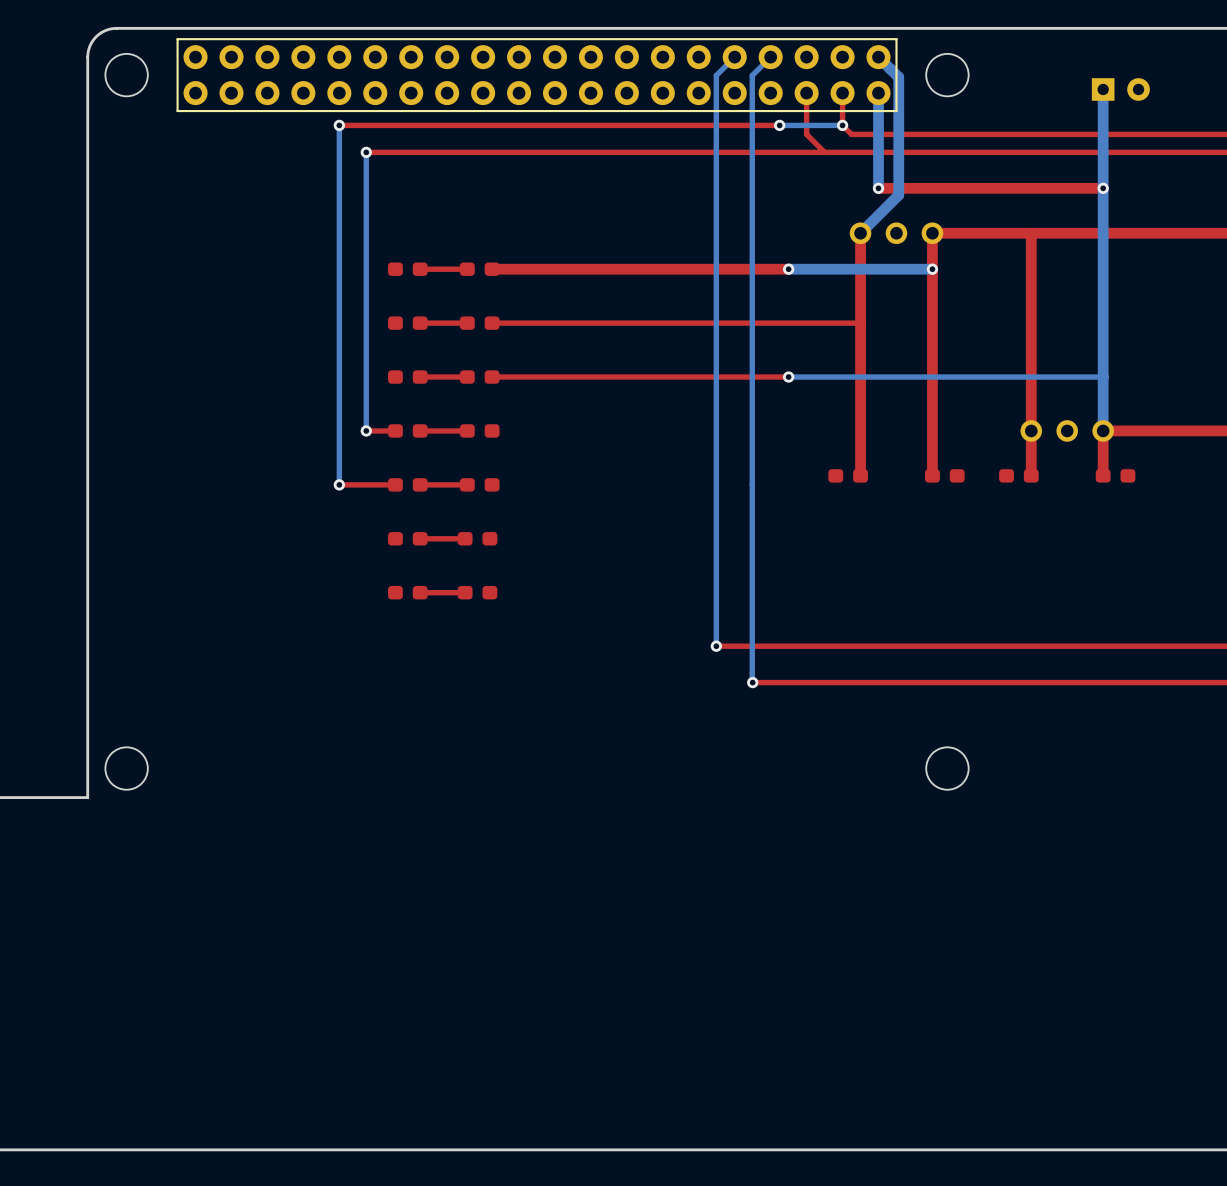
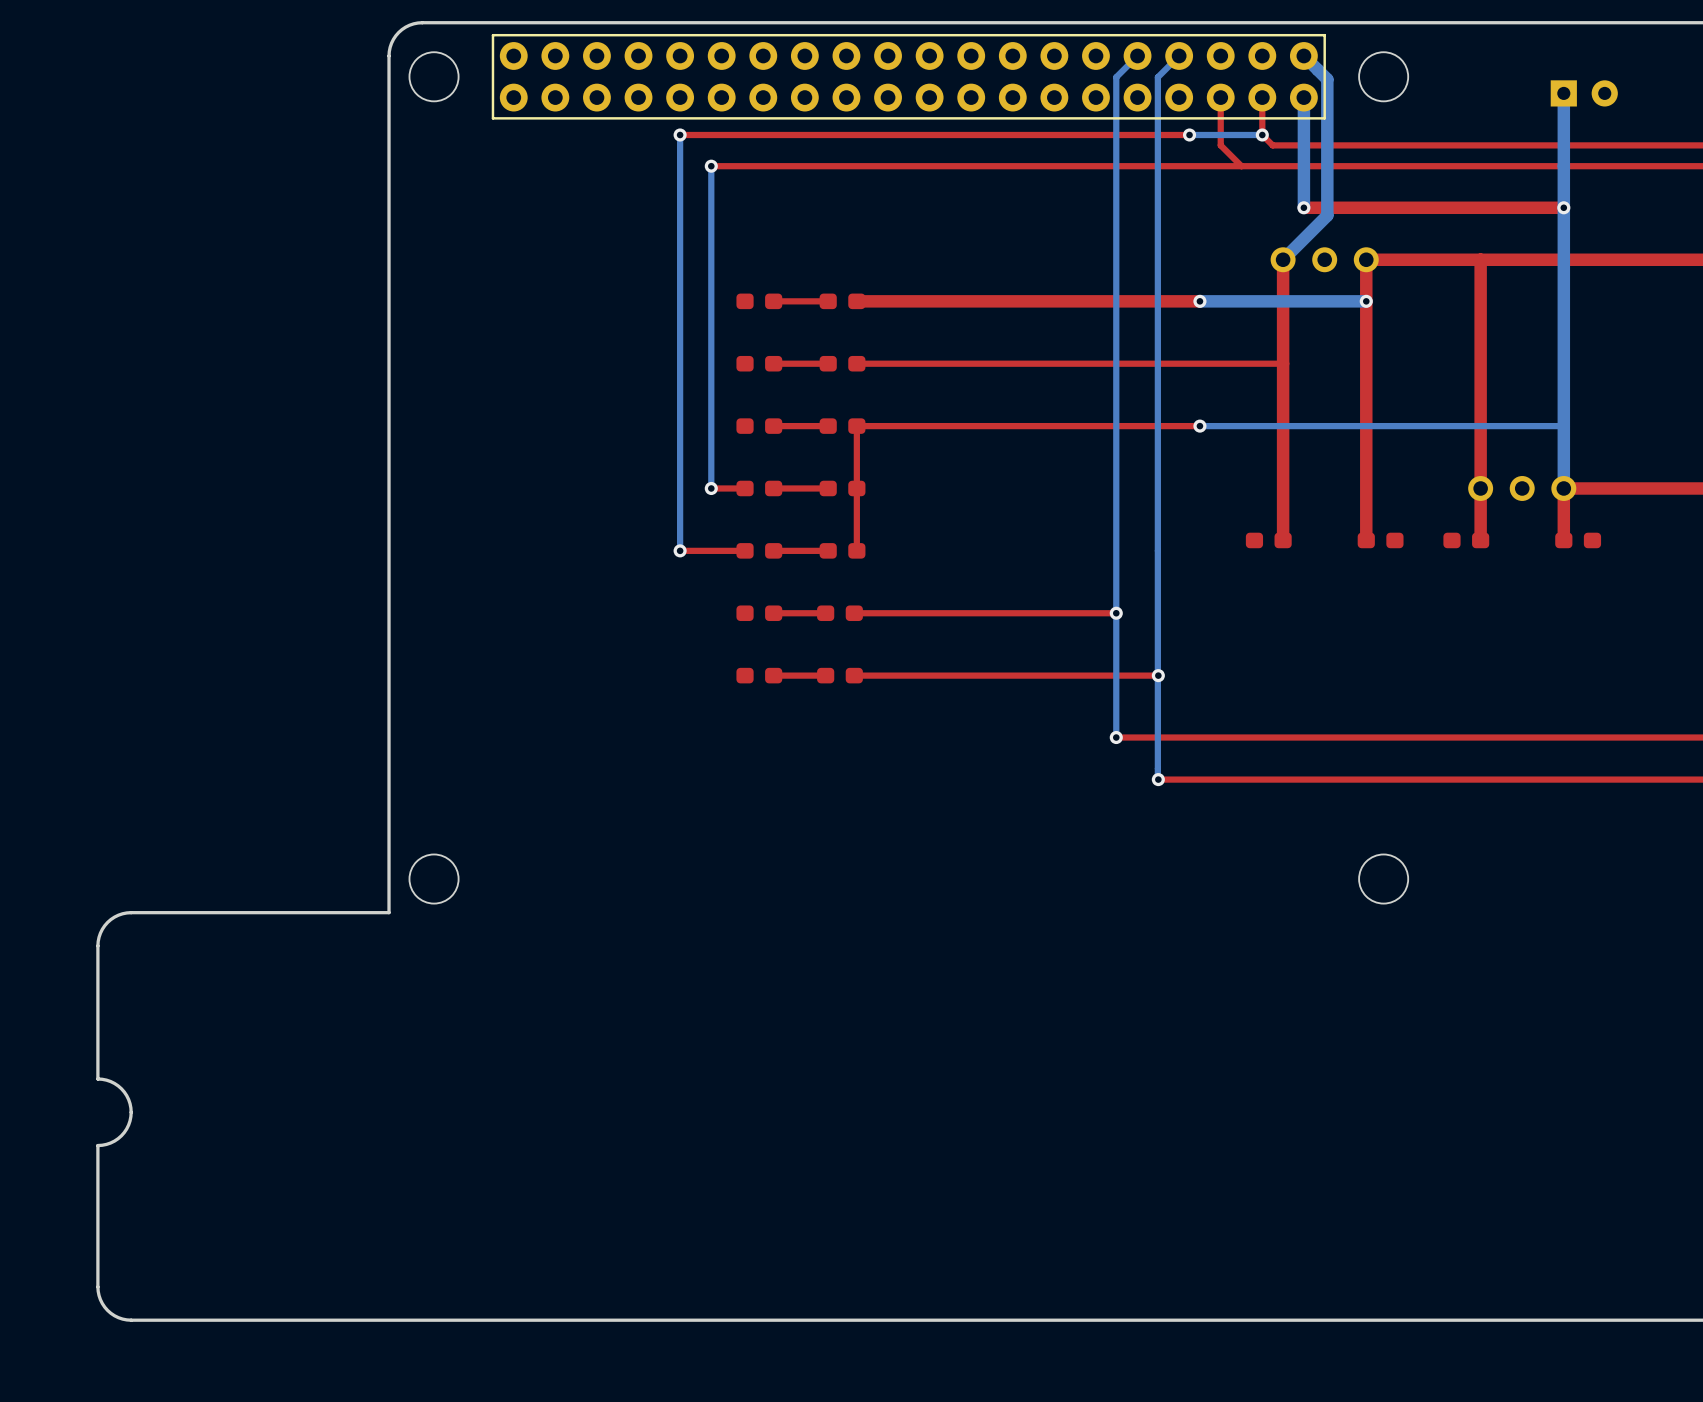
top track: none -> (856, 426) (856, 550)
top track: none -> (1116, 613) (854, 613)
via: none -> (1116, 613)
top track: none -> (1158, 675) (854, 675)
via: none -> (1158, 675)

